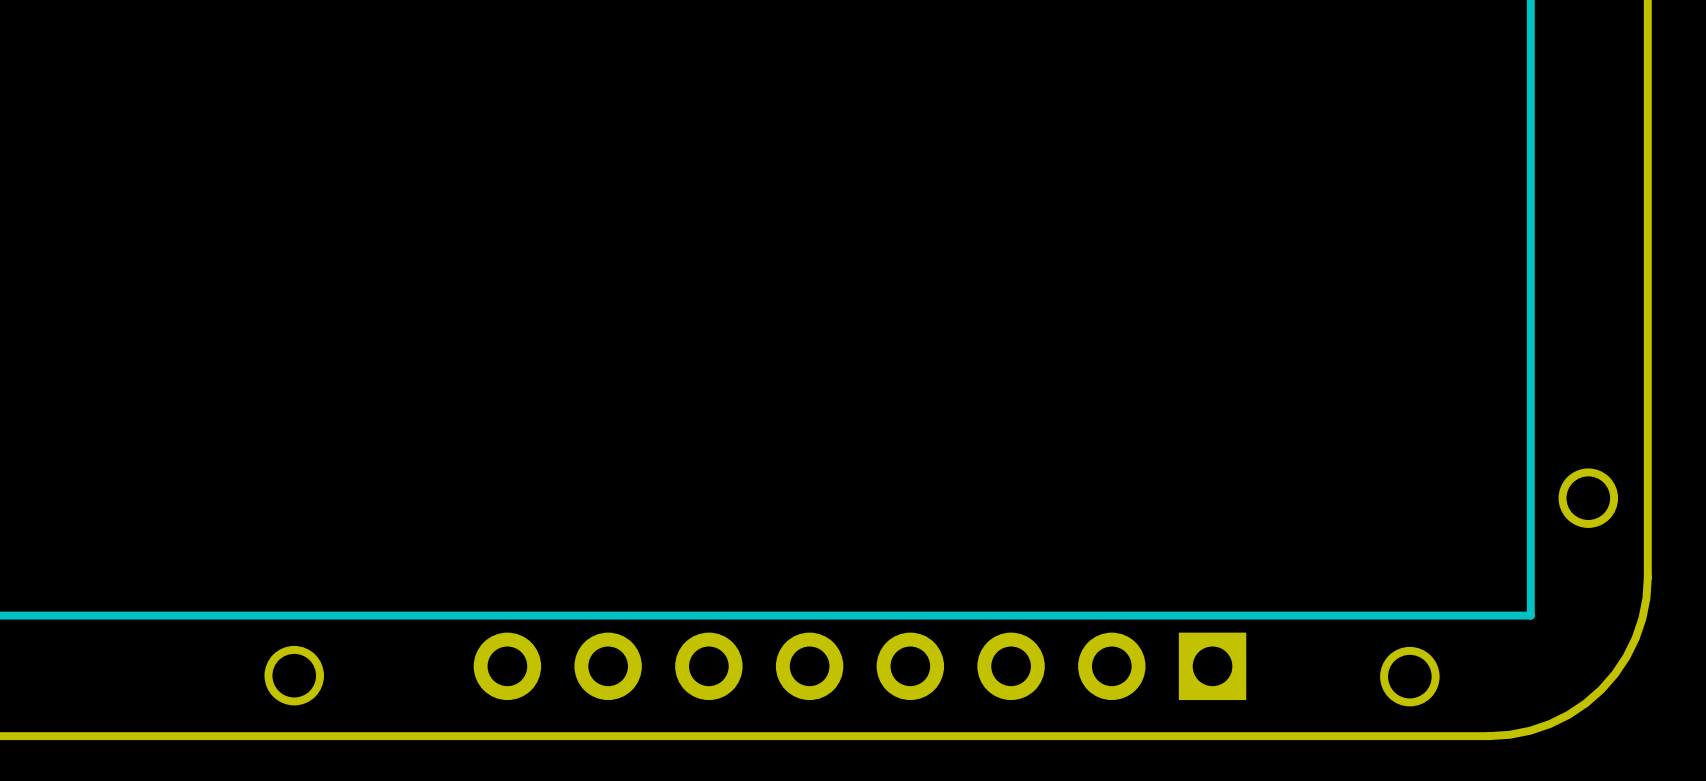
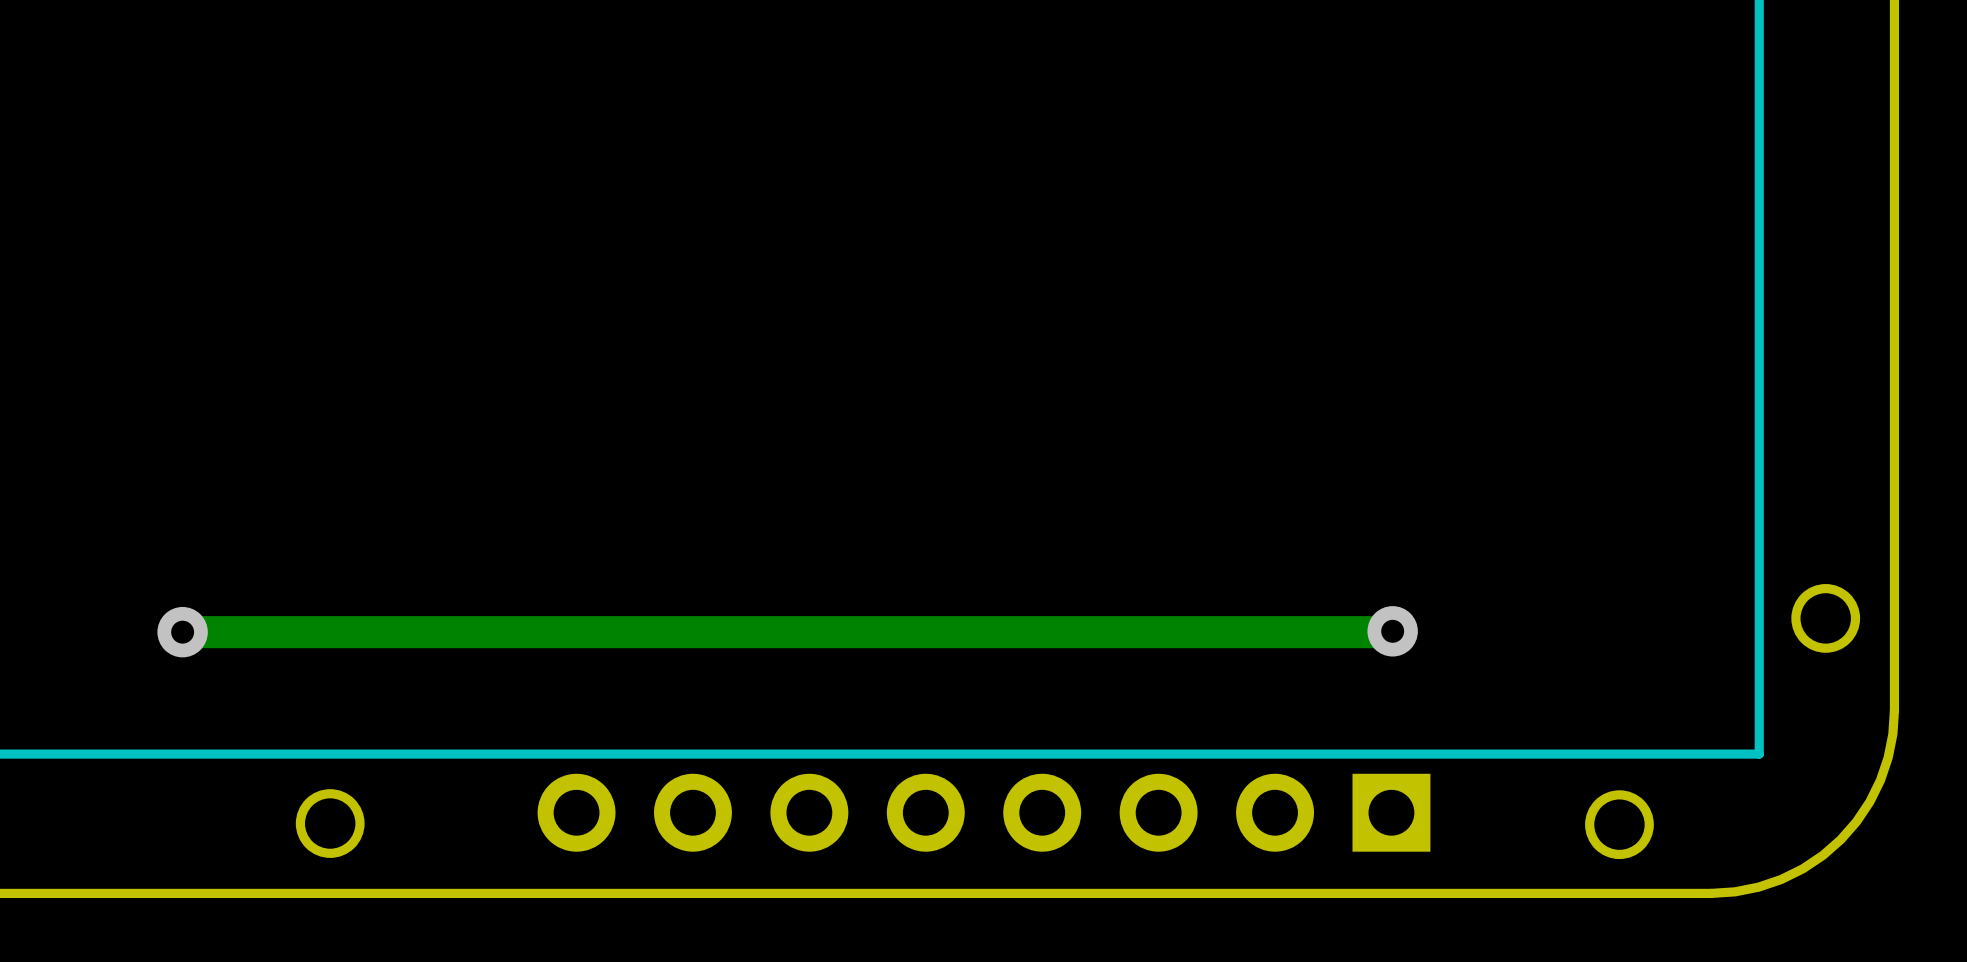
track: none -> (1392, 631) (182, 632)
via: none -> (1392, 631)
via: none -> (182, 632)

